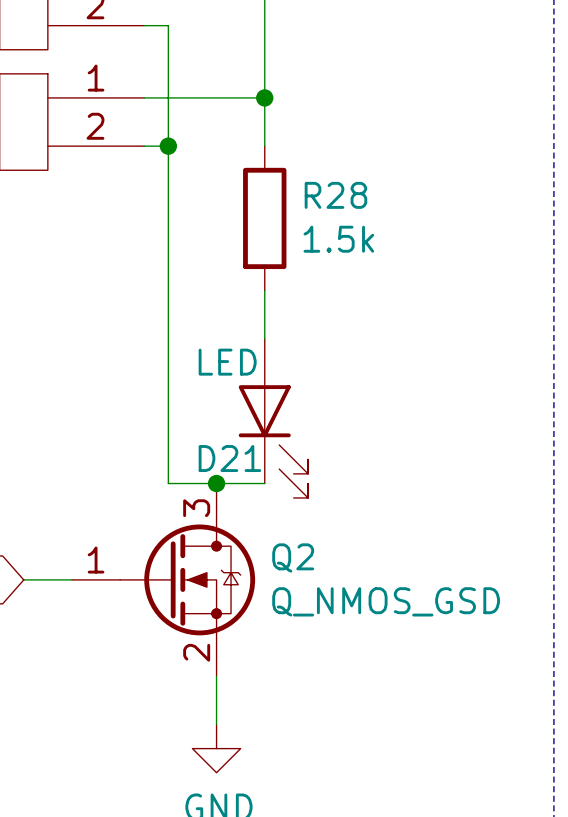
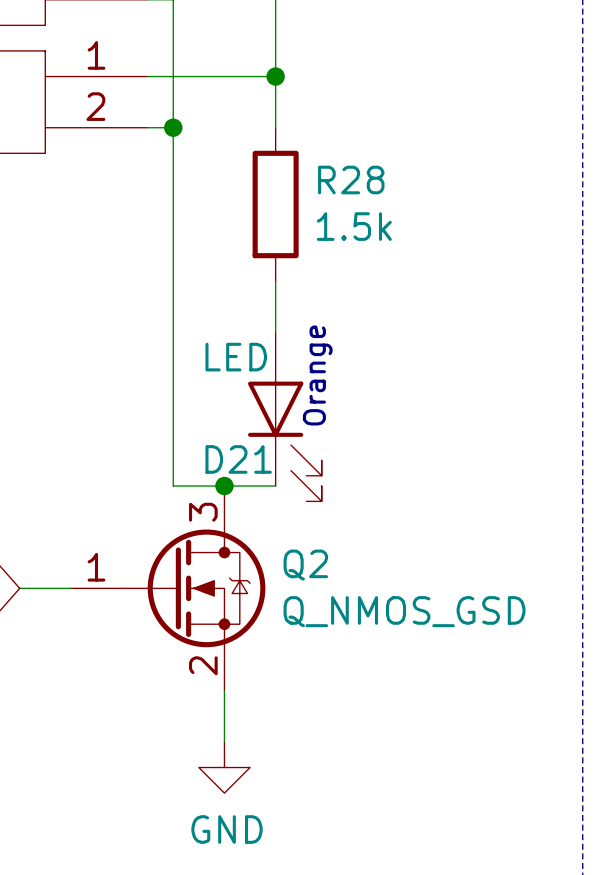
text: none -> Orange (317, 375)

